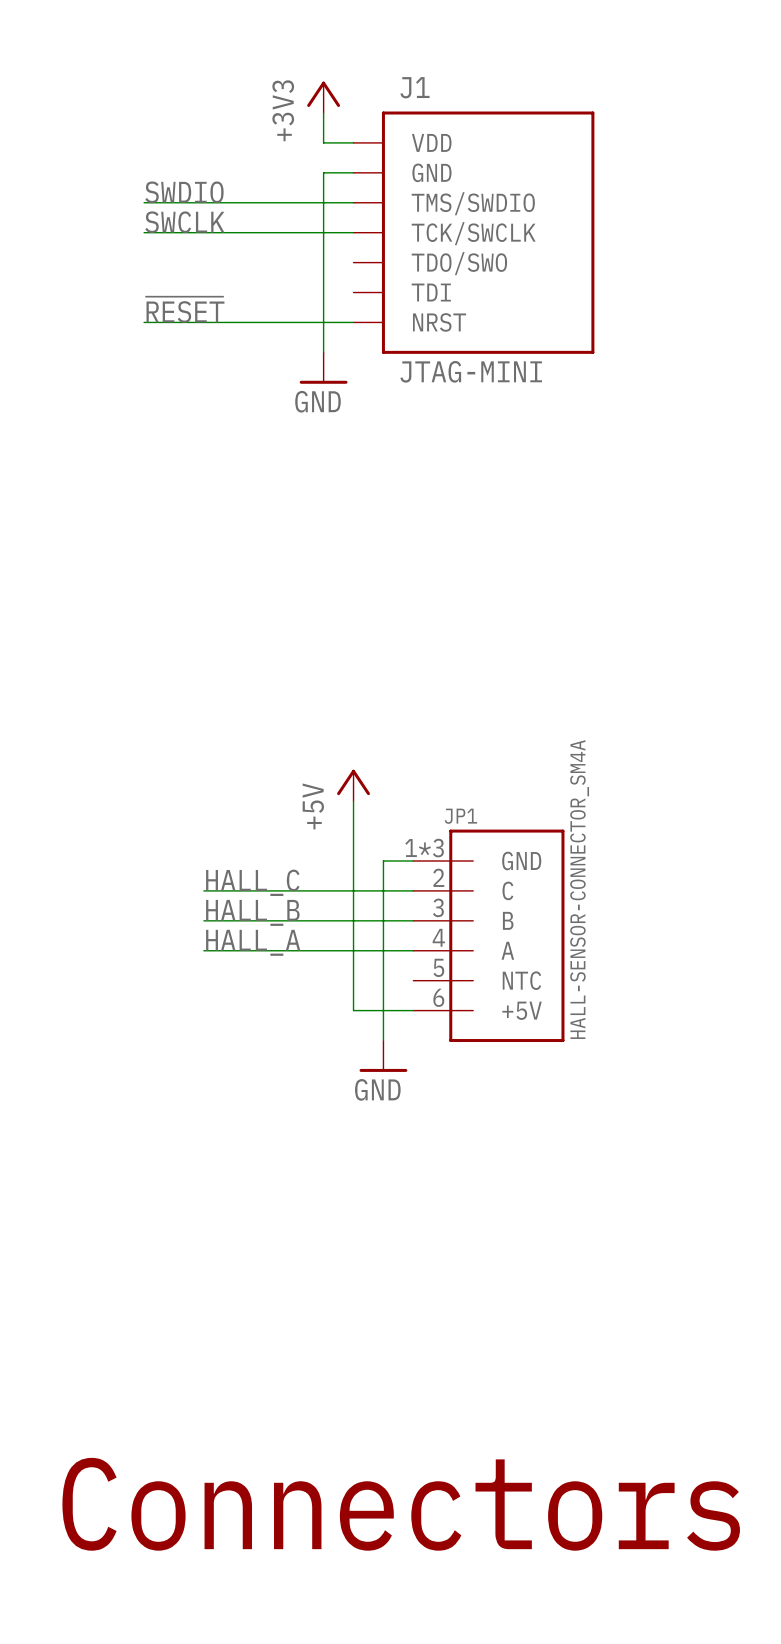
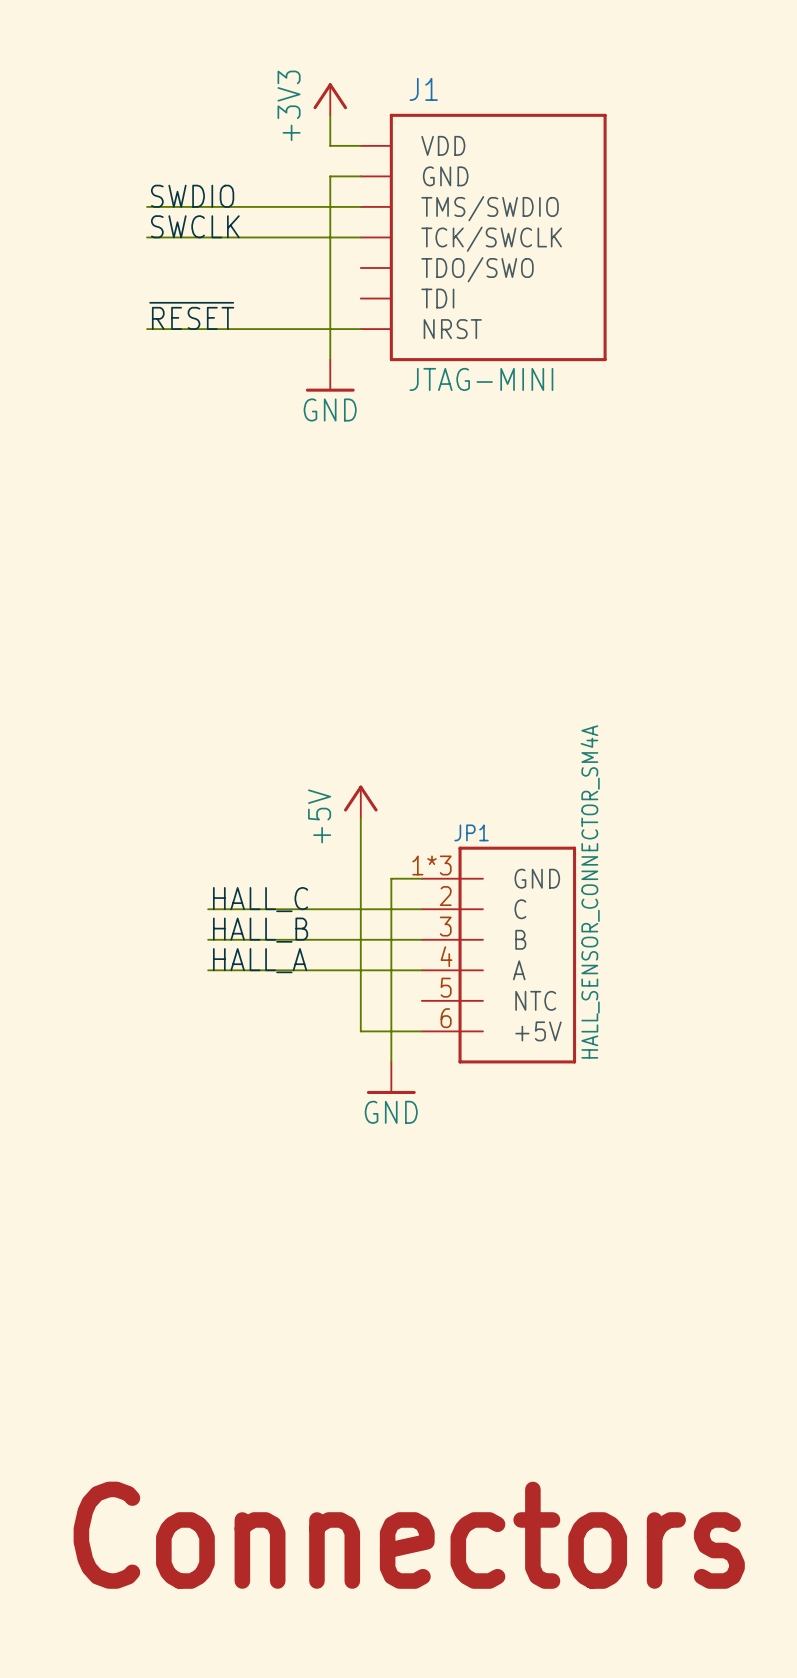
JP1 value: HALL-SENSOR-CONNECTOR_SM4A (579, 889) -> HALL_SENSOR_CONNECTOR_SM4A (590, 891)

